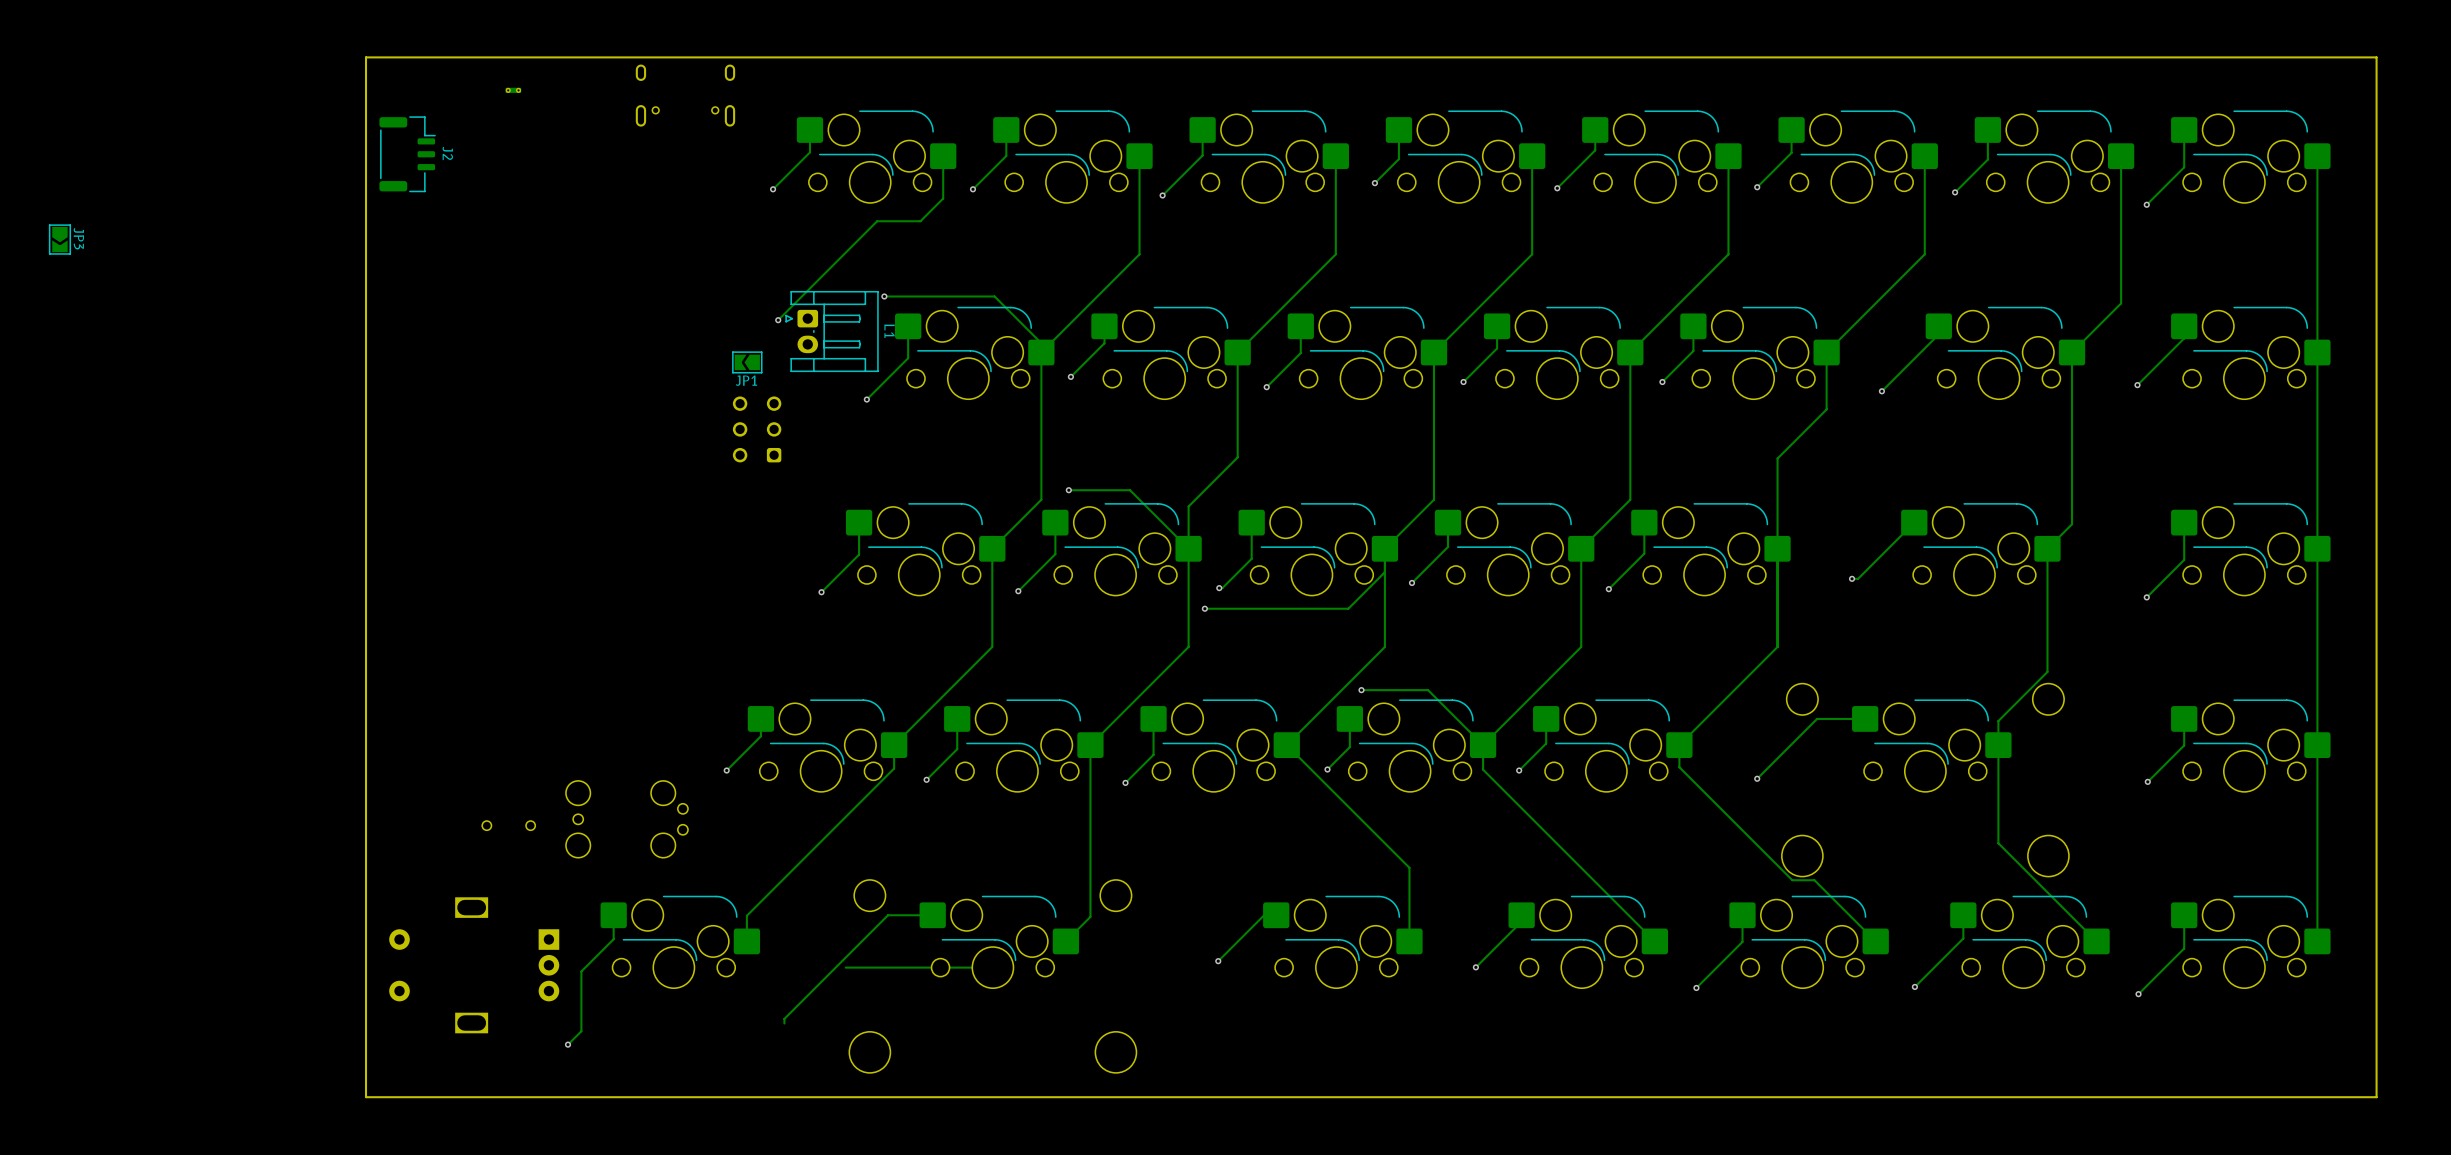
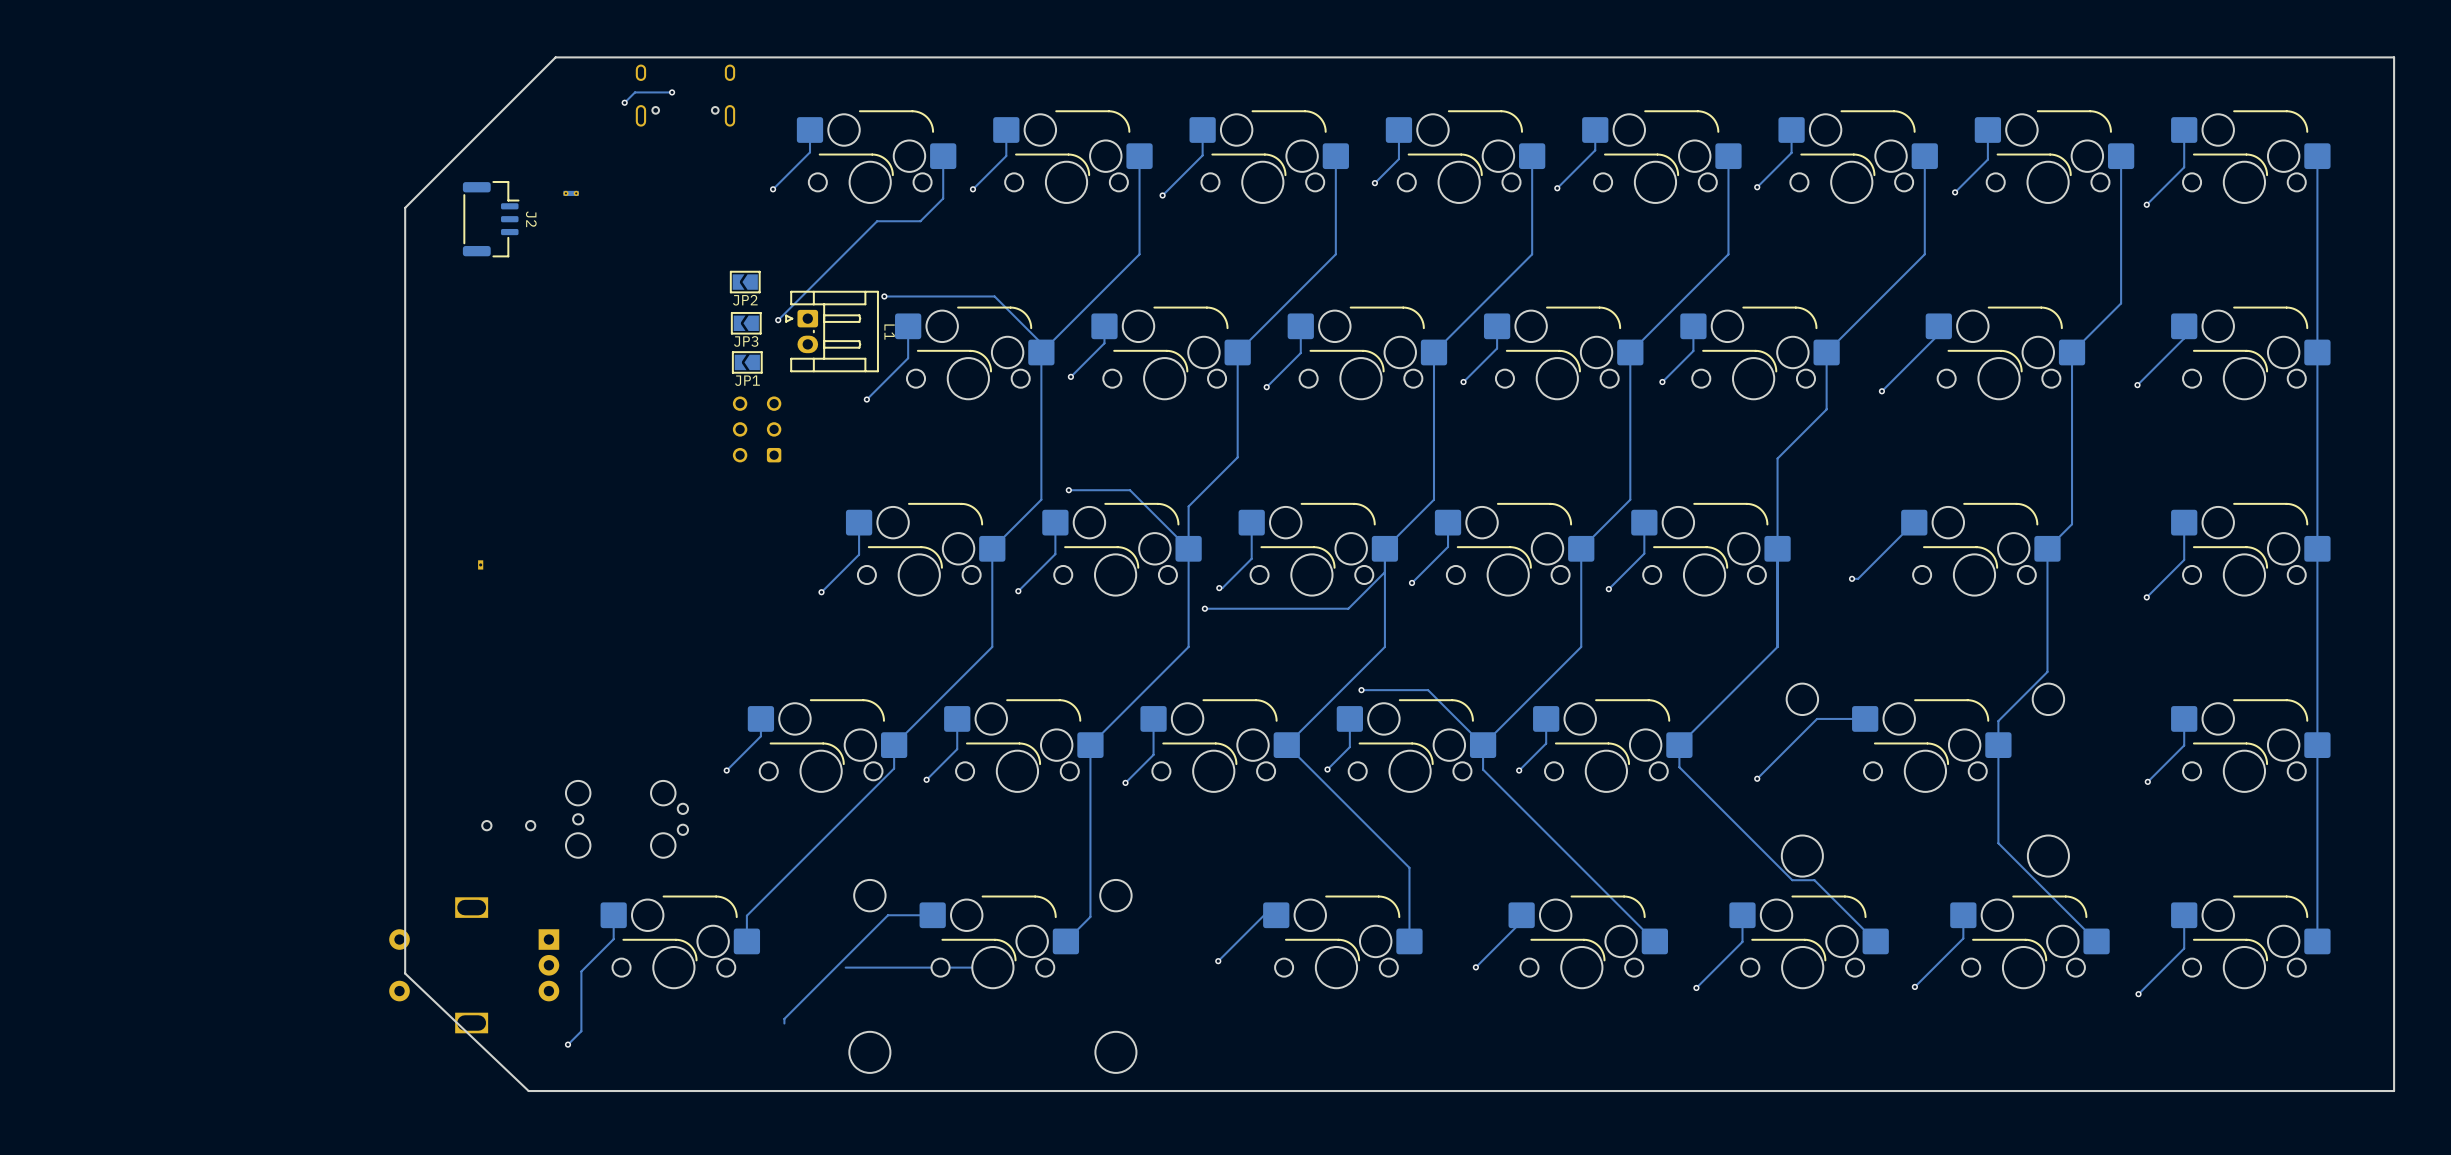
board edge: (2376, 57) (2376, 1097) (366, 1097) (366, 57) (555, 57) -> (2376, 57) (2394, 57) (2394, 1091) (528, 1091) (405, 973) (405, 207) (555, 57)
part position: (513, 90) -> (571, 193)
track: none -> (672, 92) (634, 92) (624, 102)
via: none -> (672, 92)
via: none -> (624, 102)
J2 position: (407, 154) -> (491, 219)
JP3 rotation: 0° (59, 239) -> 90° clockwise (746, 323)
JP3 position: (59, 239) -> (746, 323)
JP2: none -> (745, 282)
part: none -> (480, 564)

